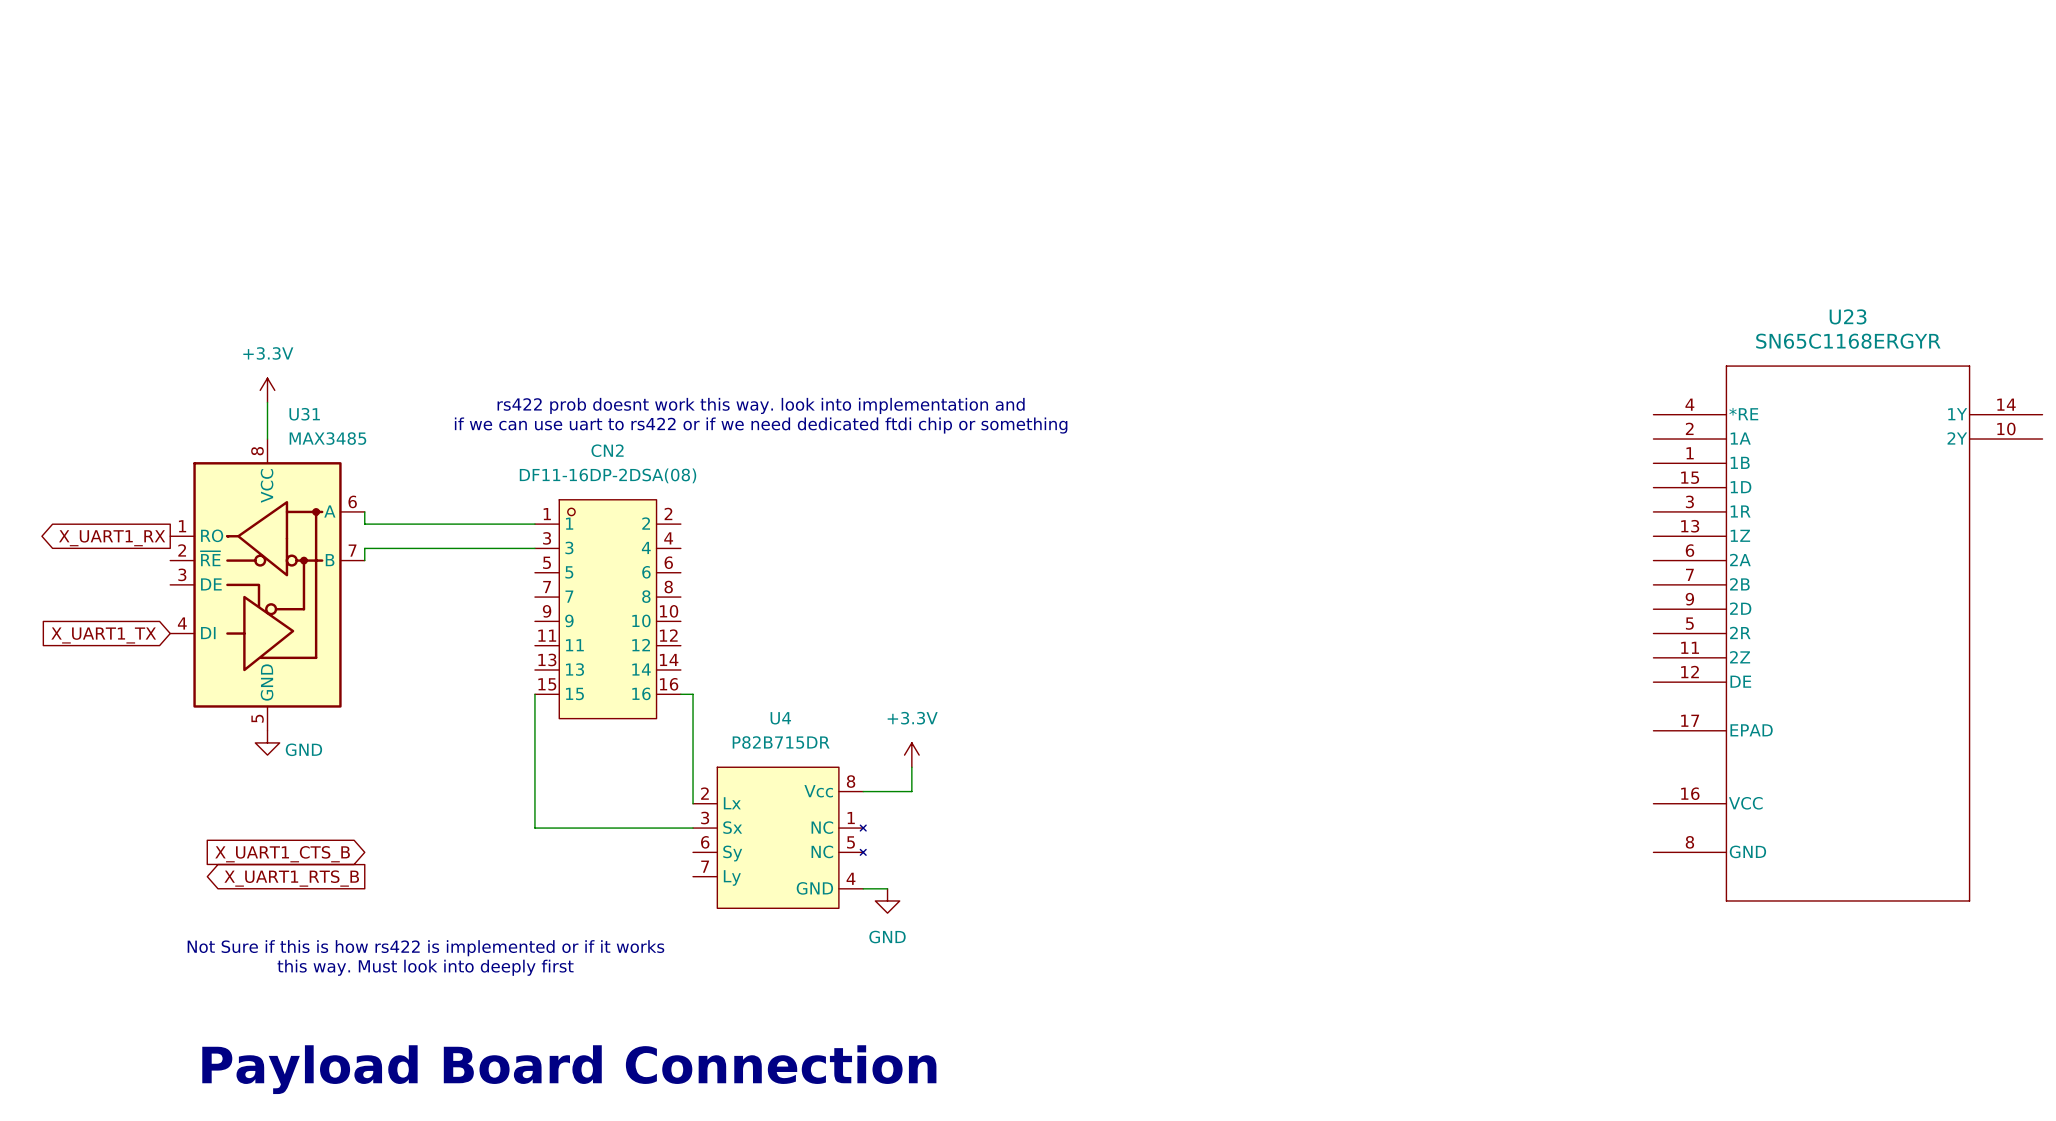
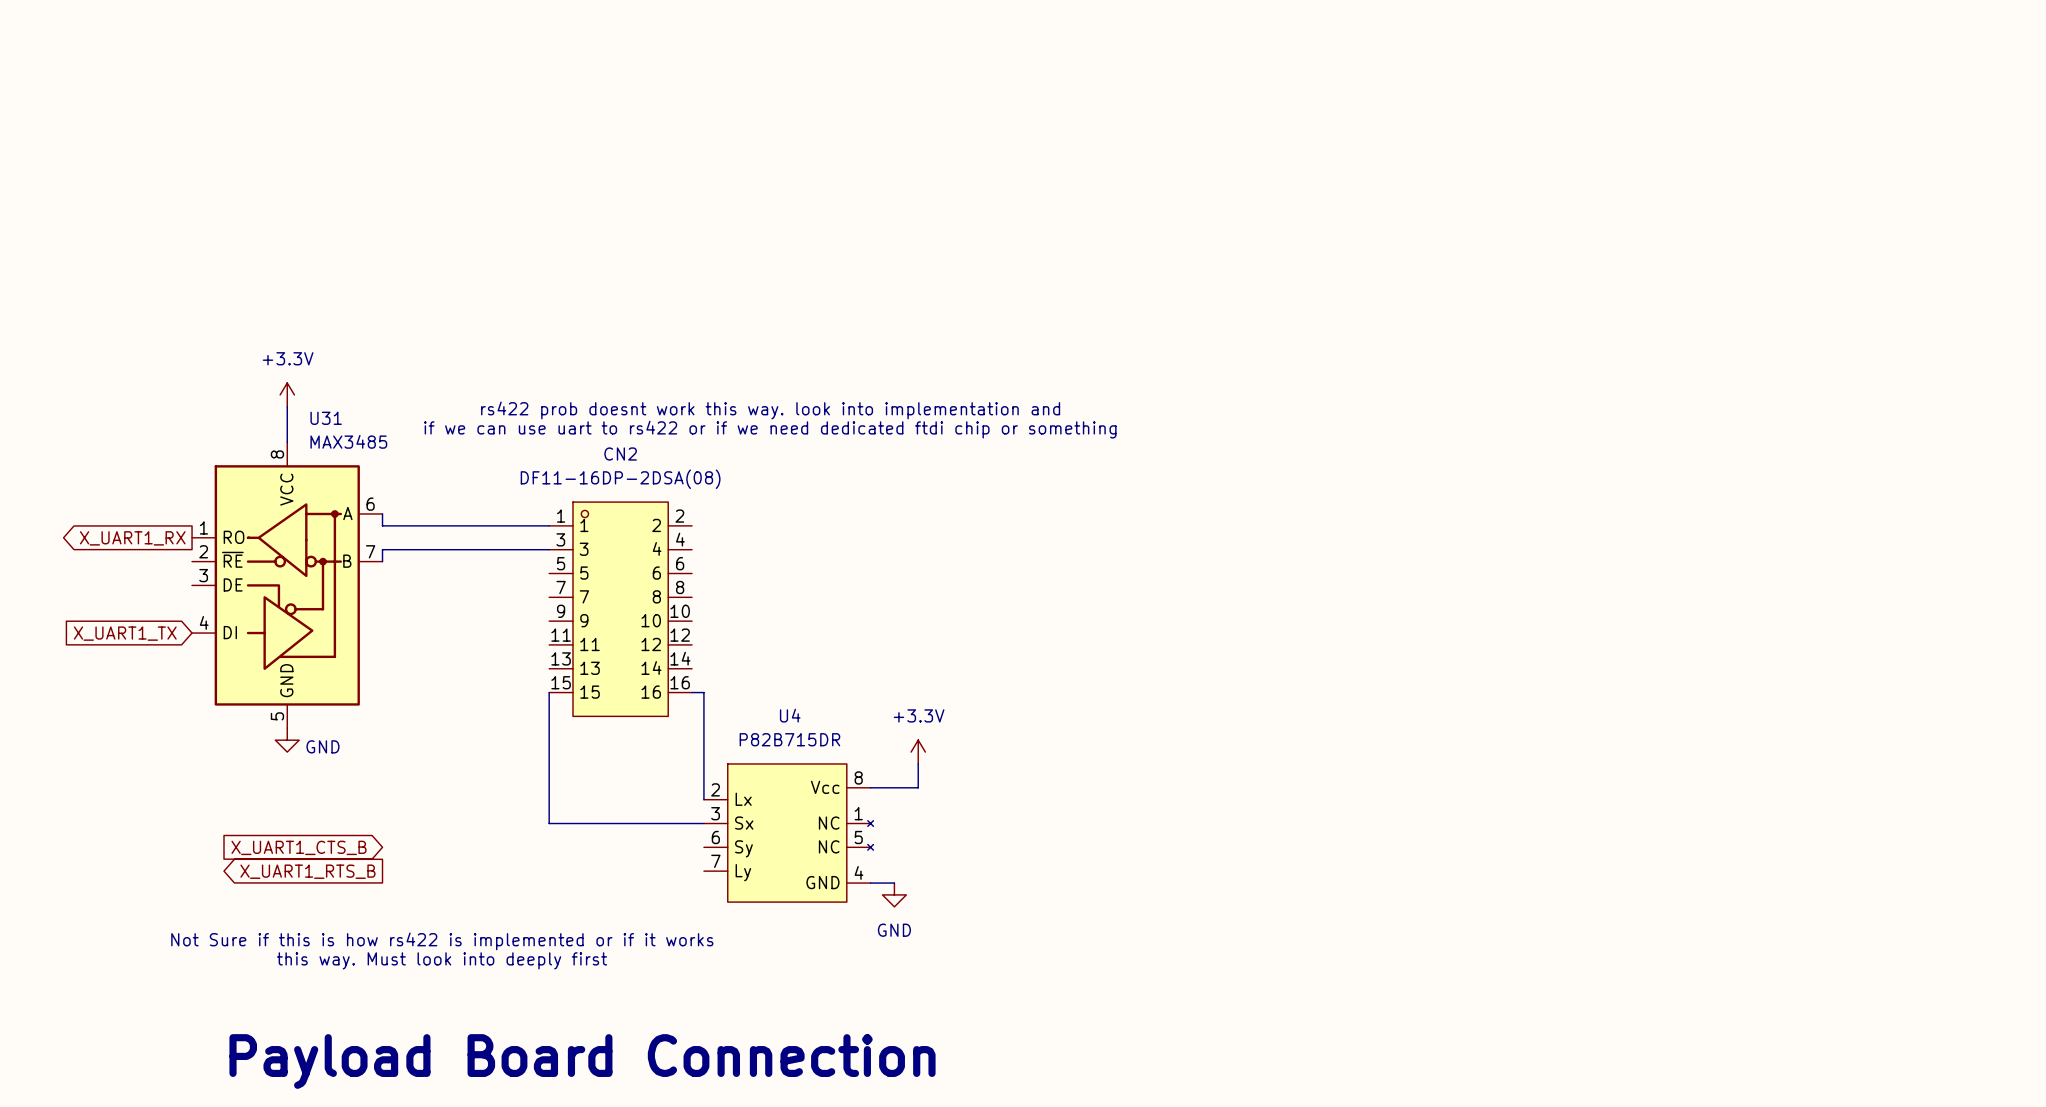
U23: SN65C1168ERGYR (1847, 633) -> none

